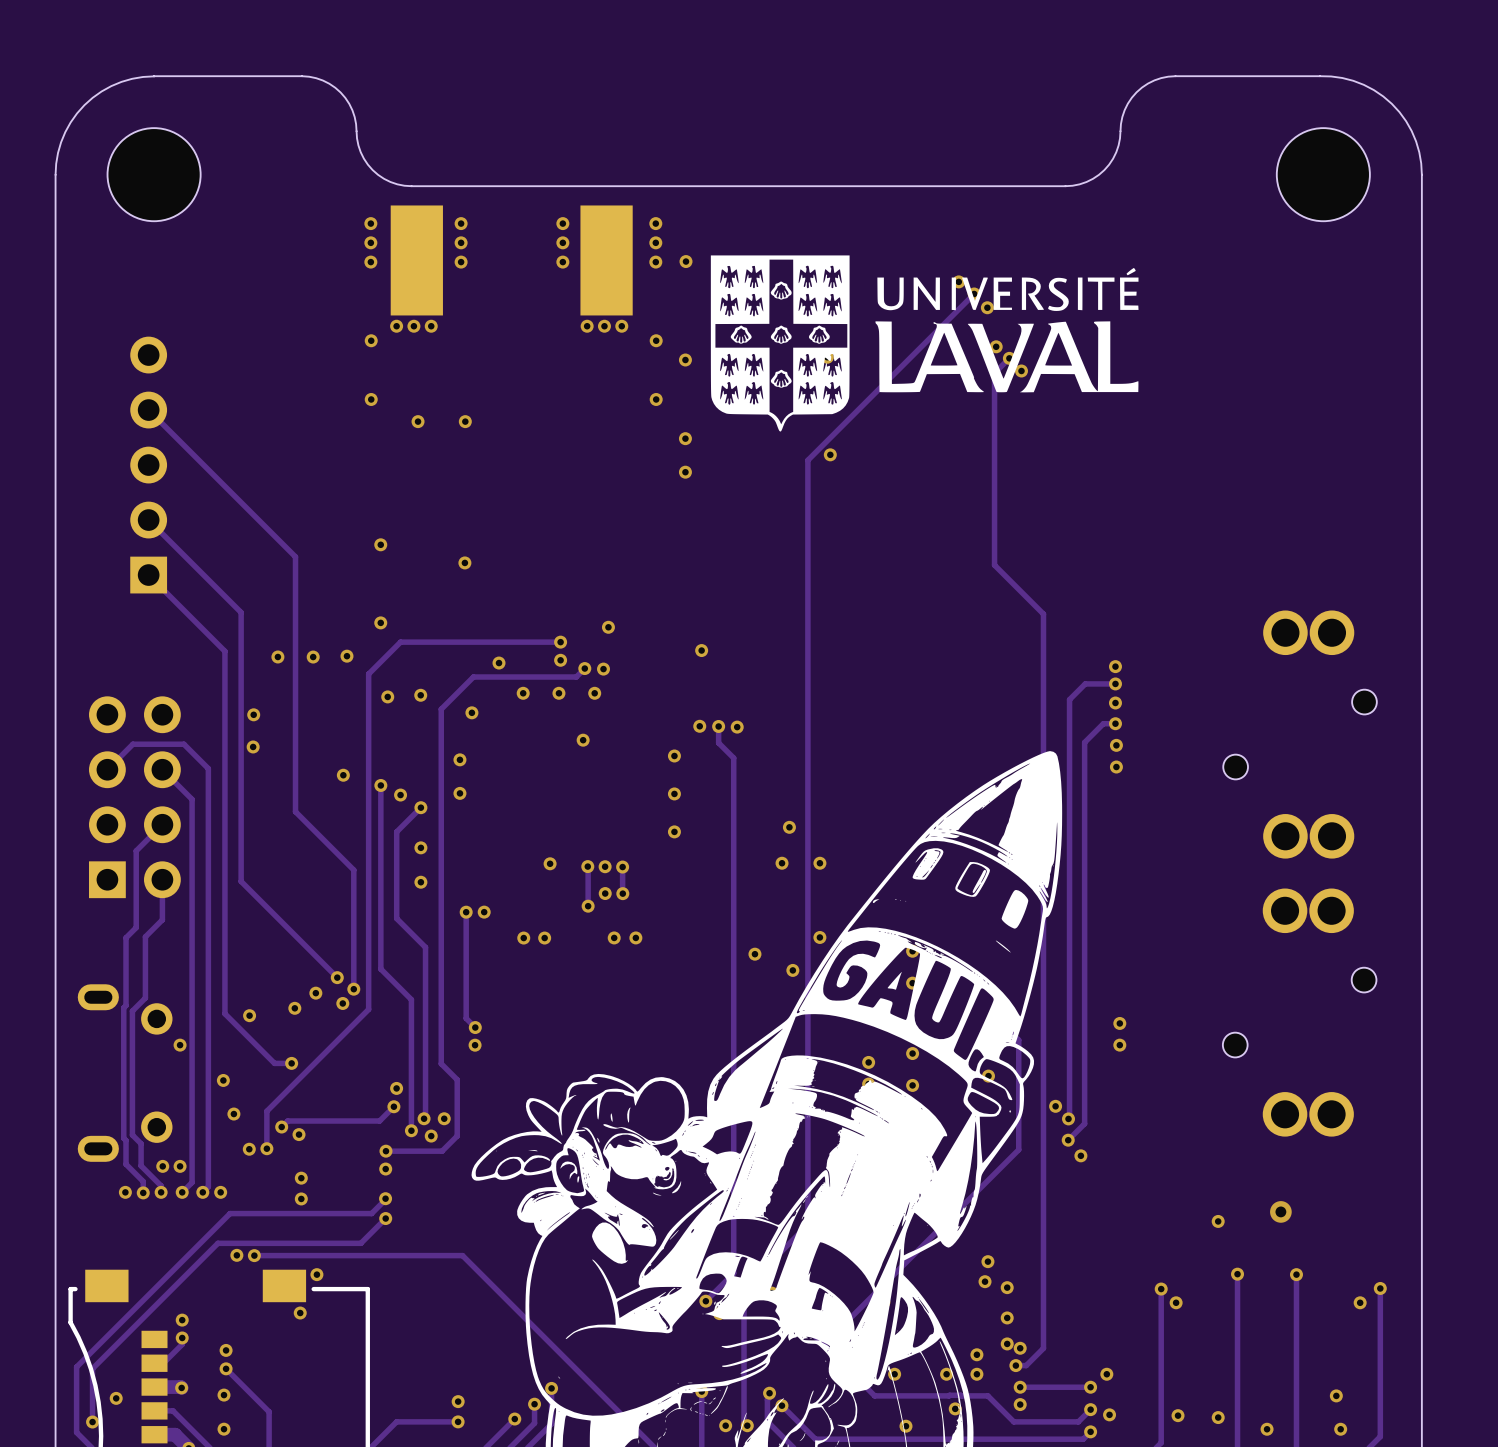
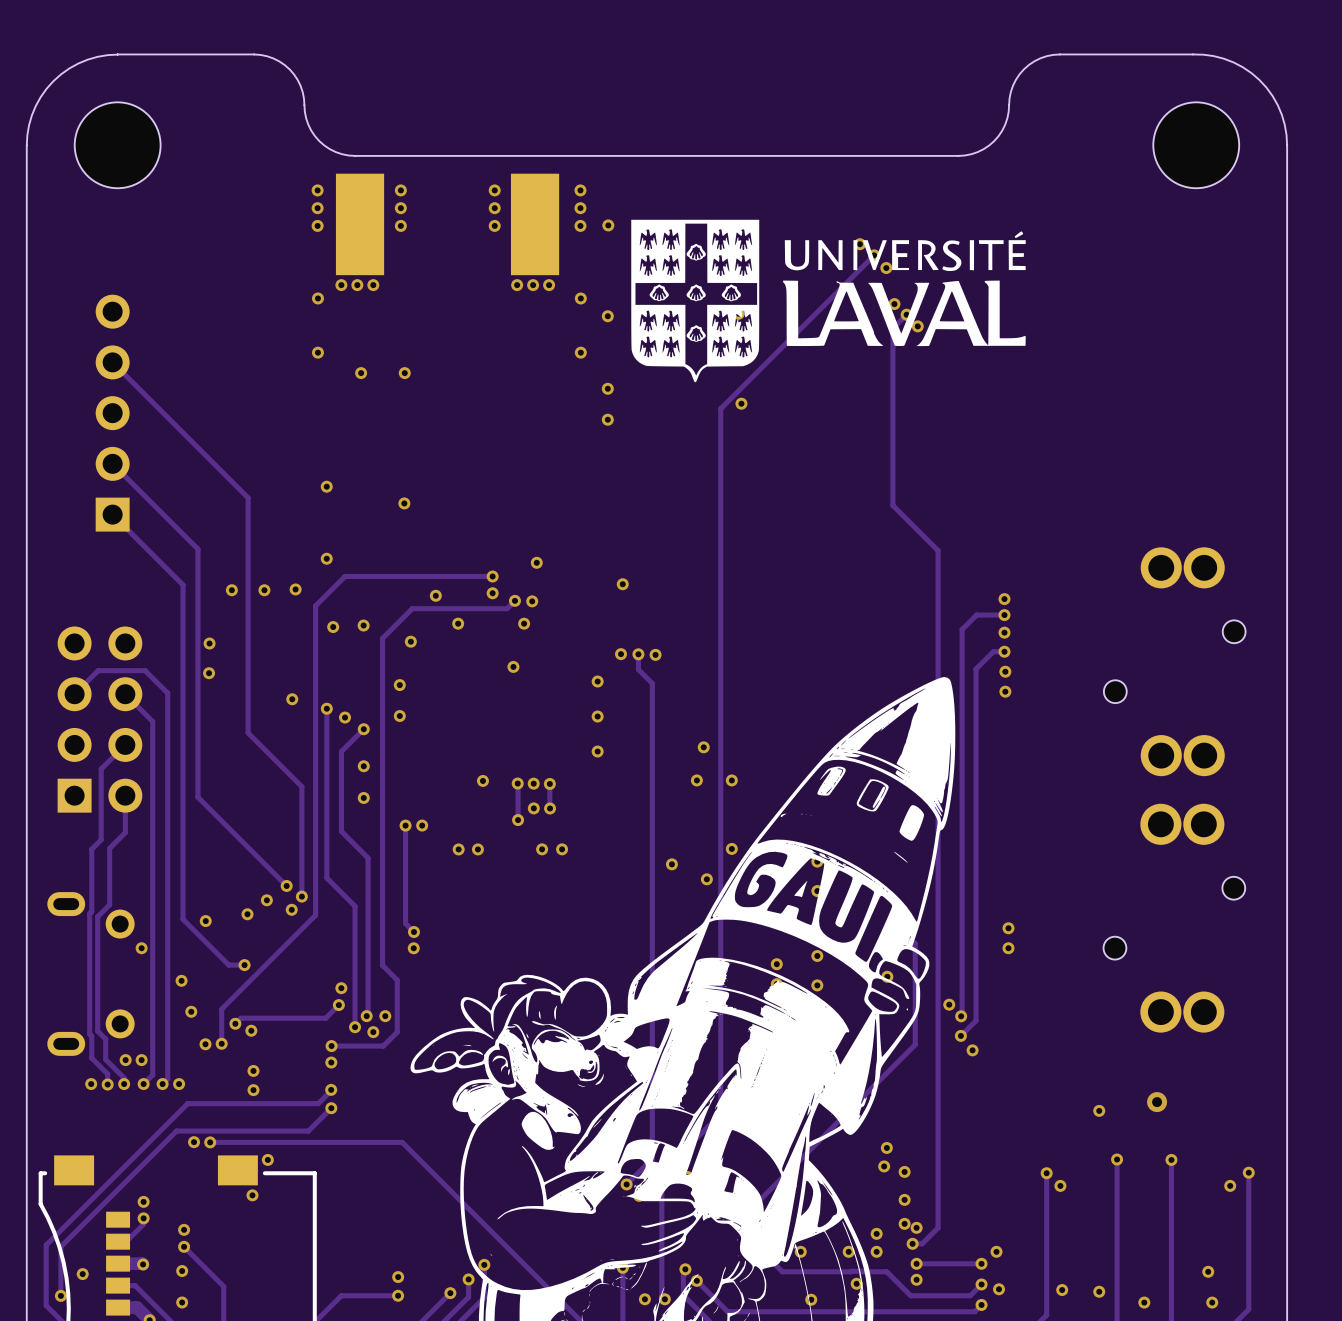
via: (558, 693) -> none

